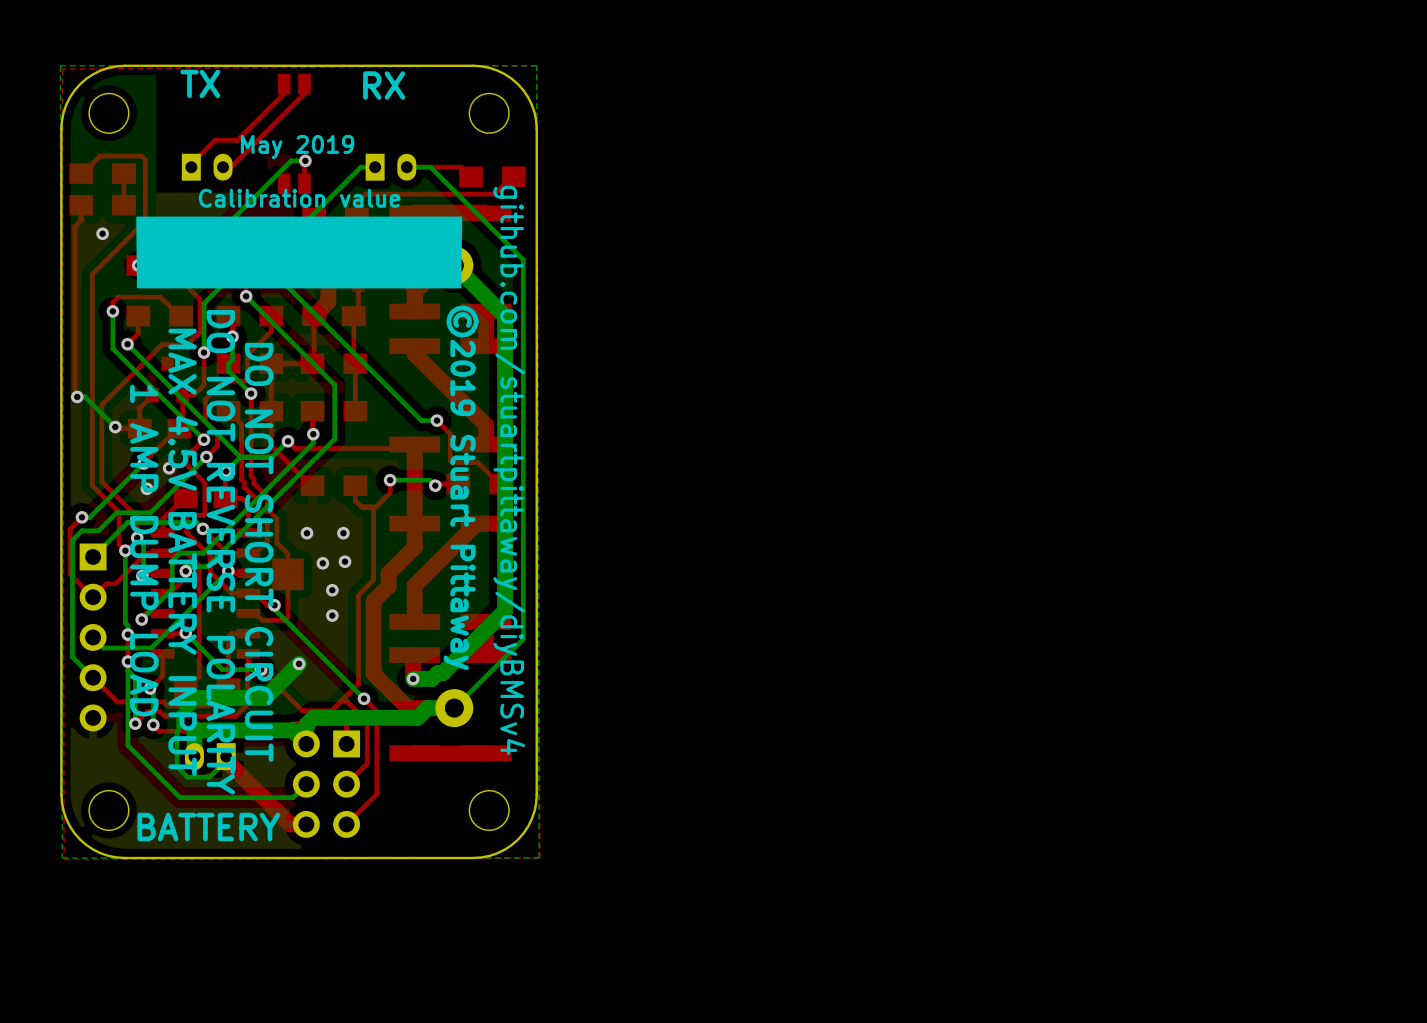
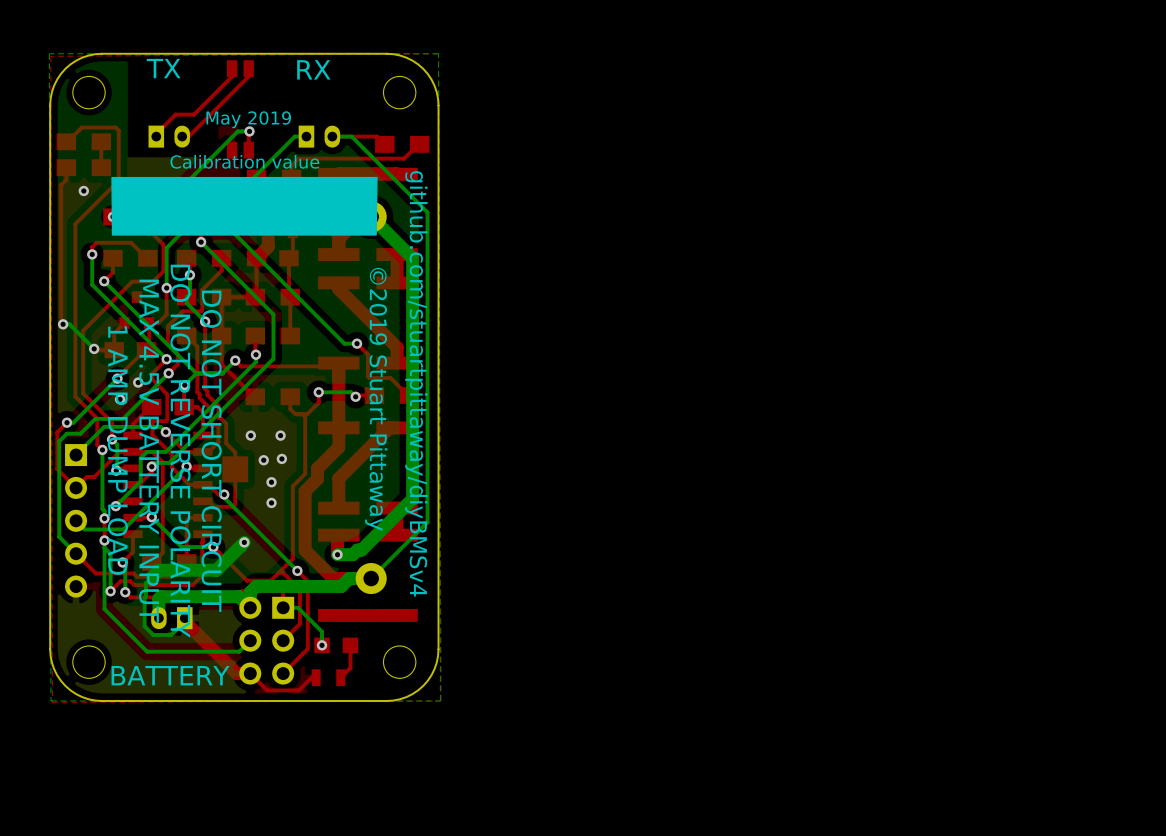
bottom track: none -> (283, 607) (298, 607) (322, 631) (322, 645)
via: none -> (322, 645)
part: none -> (336, 645)
top track: none -> (350, 645) (350, 667) (340, 677)
top track: none -> (250, 673) (267, 690) (298, 690) (311, 677) (316, 677)
part: none -> (328, 677)

